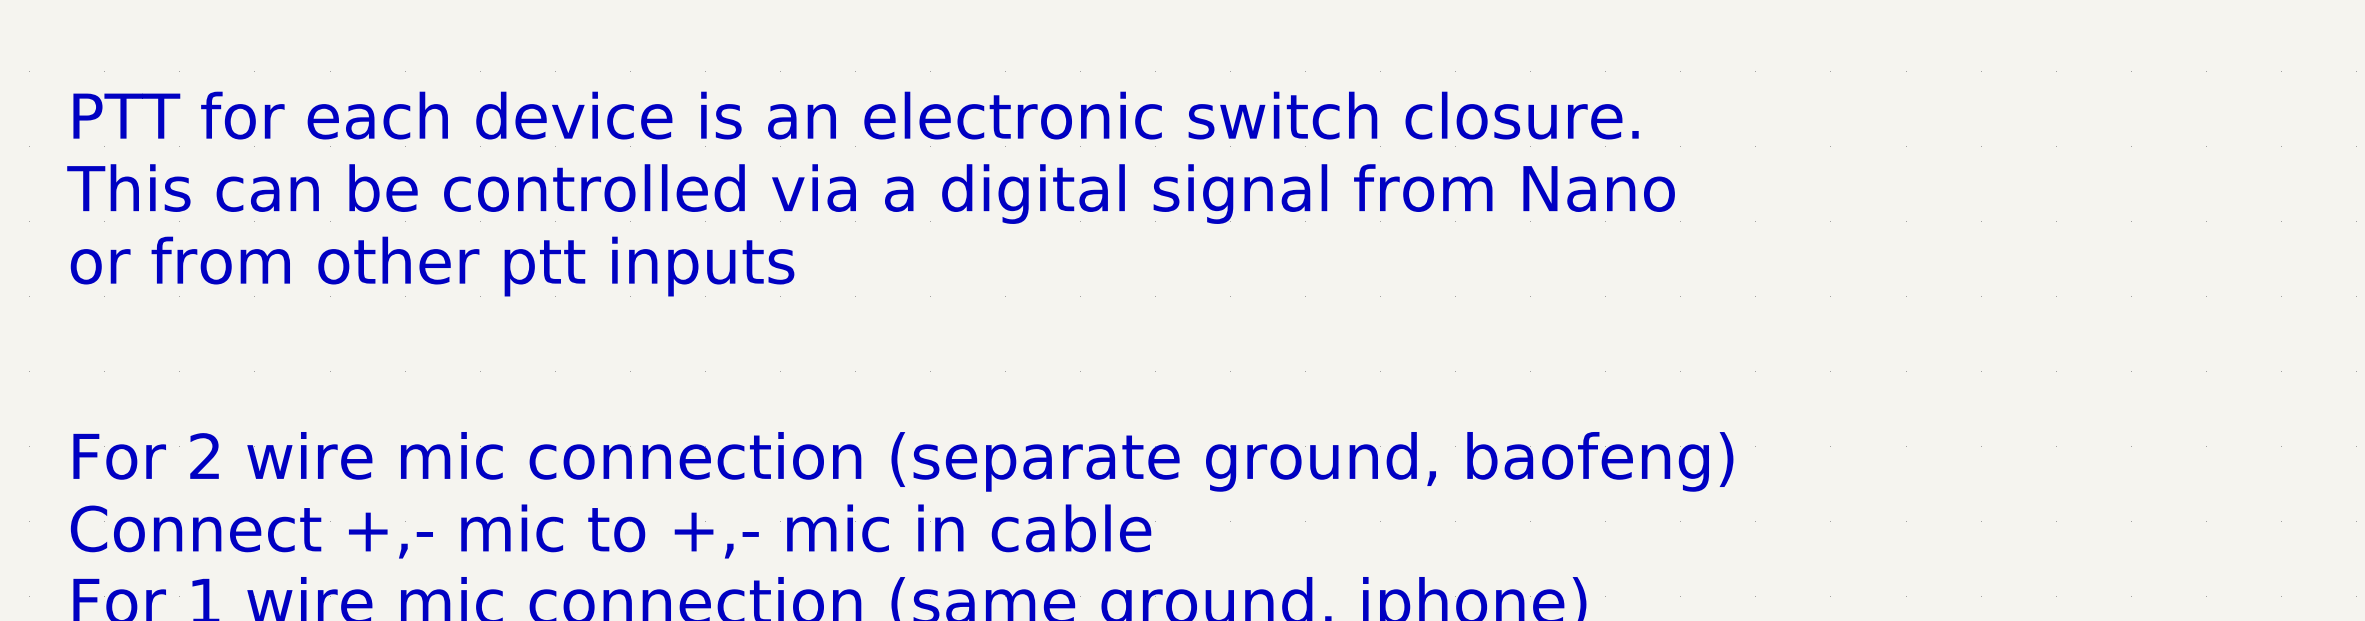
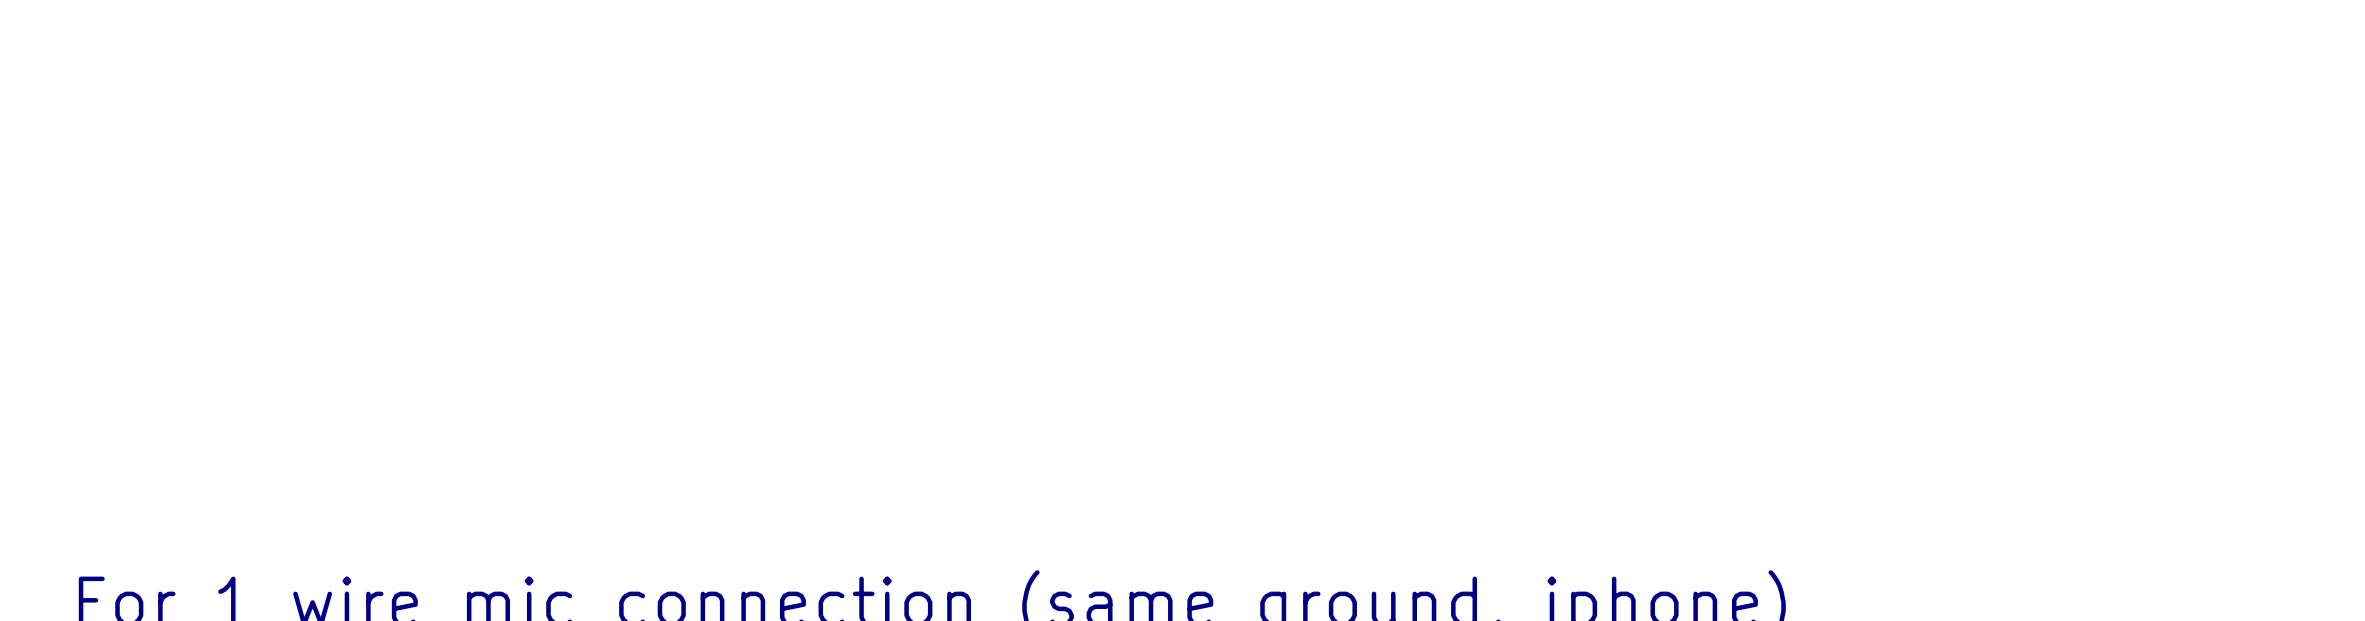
text: PTT for each device is an electronic switch closure. (856, 115) -> none
text: This can be controlled via a digital signal from Nano (871, 194) -> none
text: or from other ptt inputs (432, 266) -> none
text: For 2 wire mic connection (separate ground, baofeng) (903, 461) -> none
text: Connect +,- mic to +,- mic in cable (611, 531) -> none

